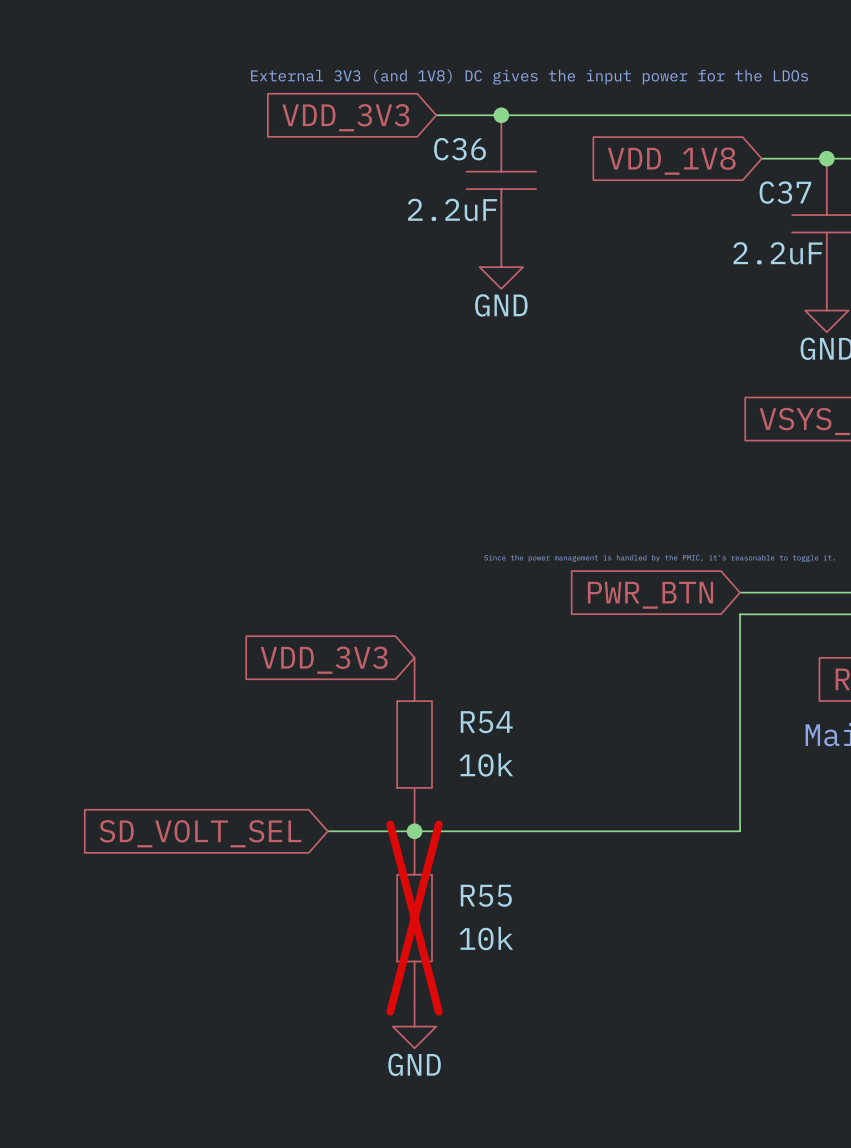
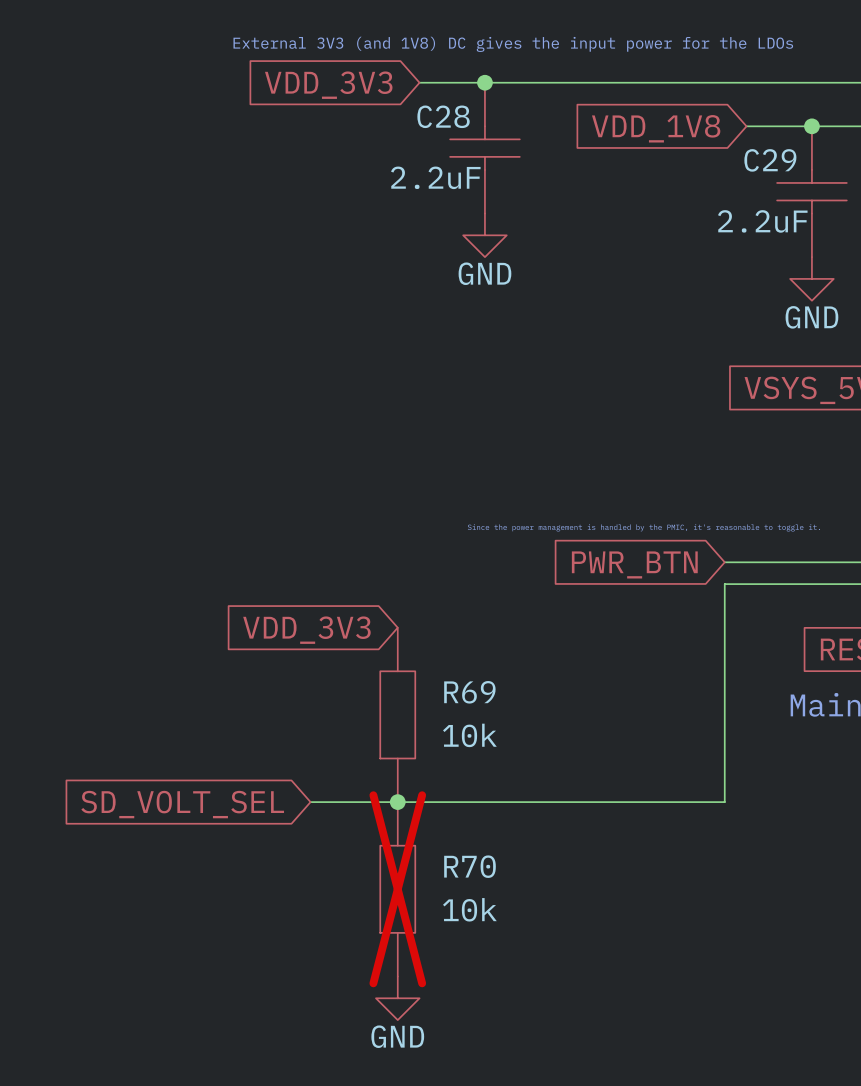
C36 name: C36 (460, 149) -> C28 (443, 116)
C37 name: C37 (785, 192) -> C29 (770, 160)
R54 name: R54 (486, 722) -> R69 (469, 692)
R55 name: R55 (486, 895) -> R70 (470, 866)

